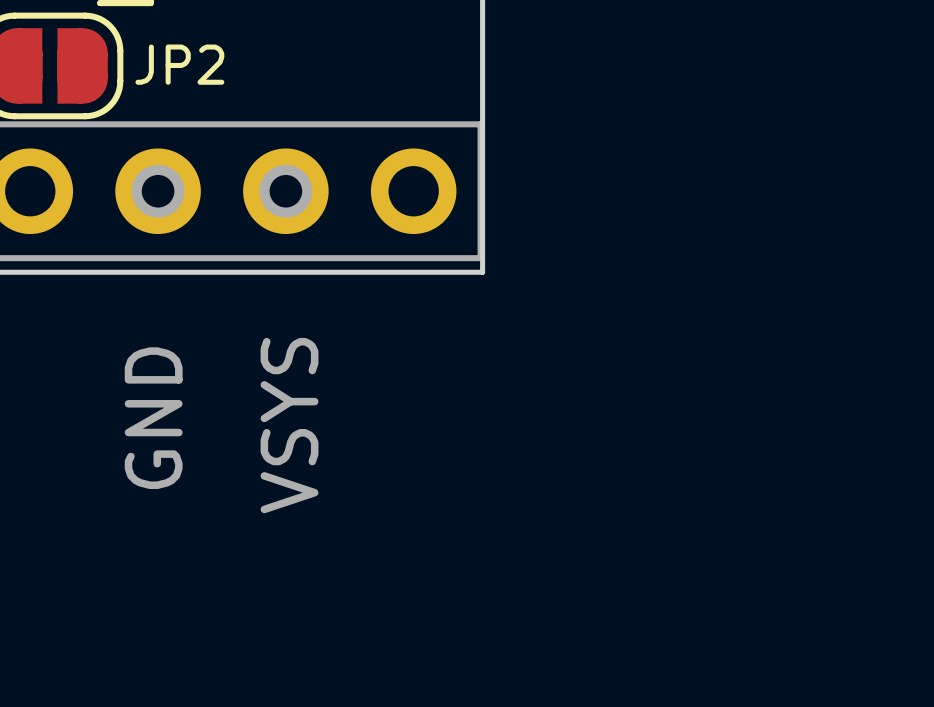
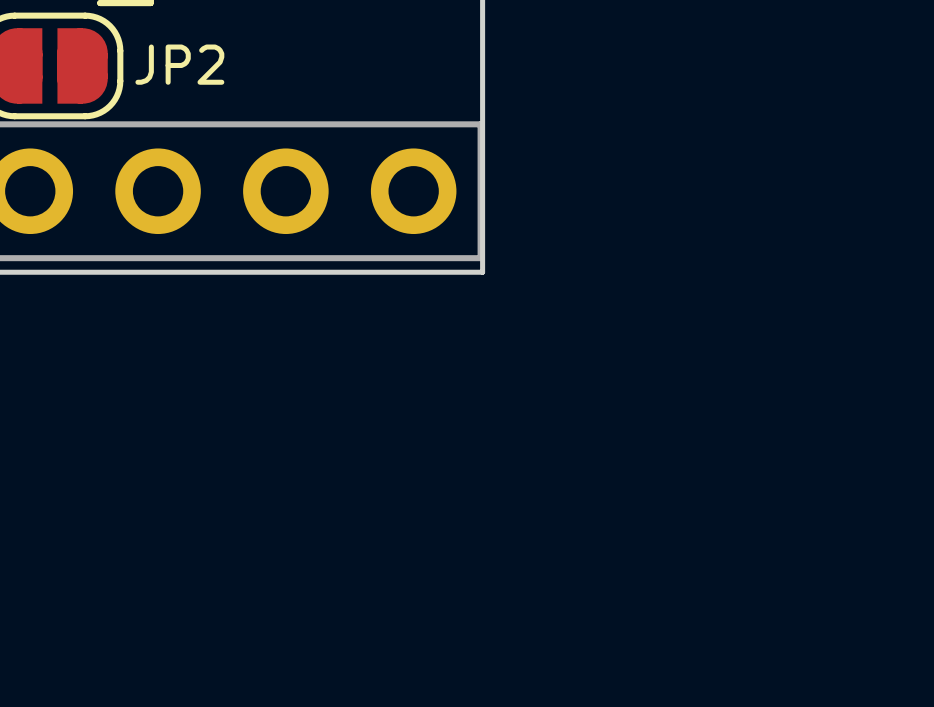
drawing: [131, 164, 185, 218] -> none
drawing: [259, 164, 313, 218] -> none
text: GND (153, 418) -> none
text: VSYS (289, 425) -> none

